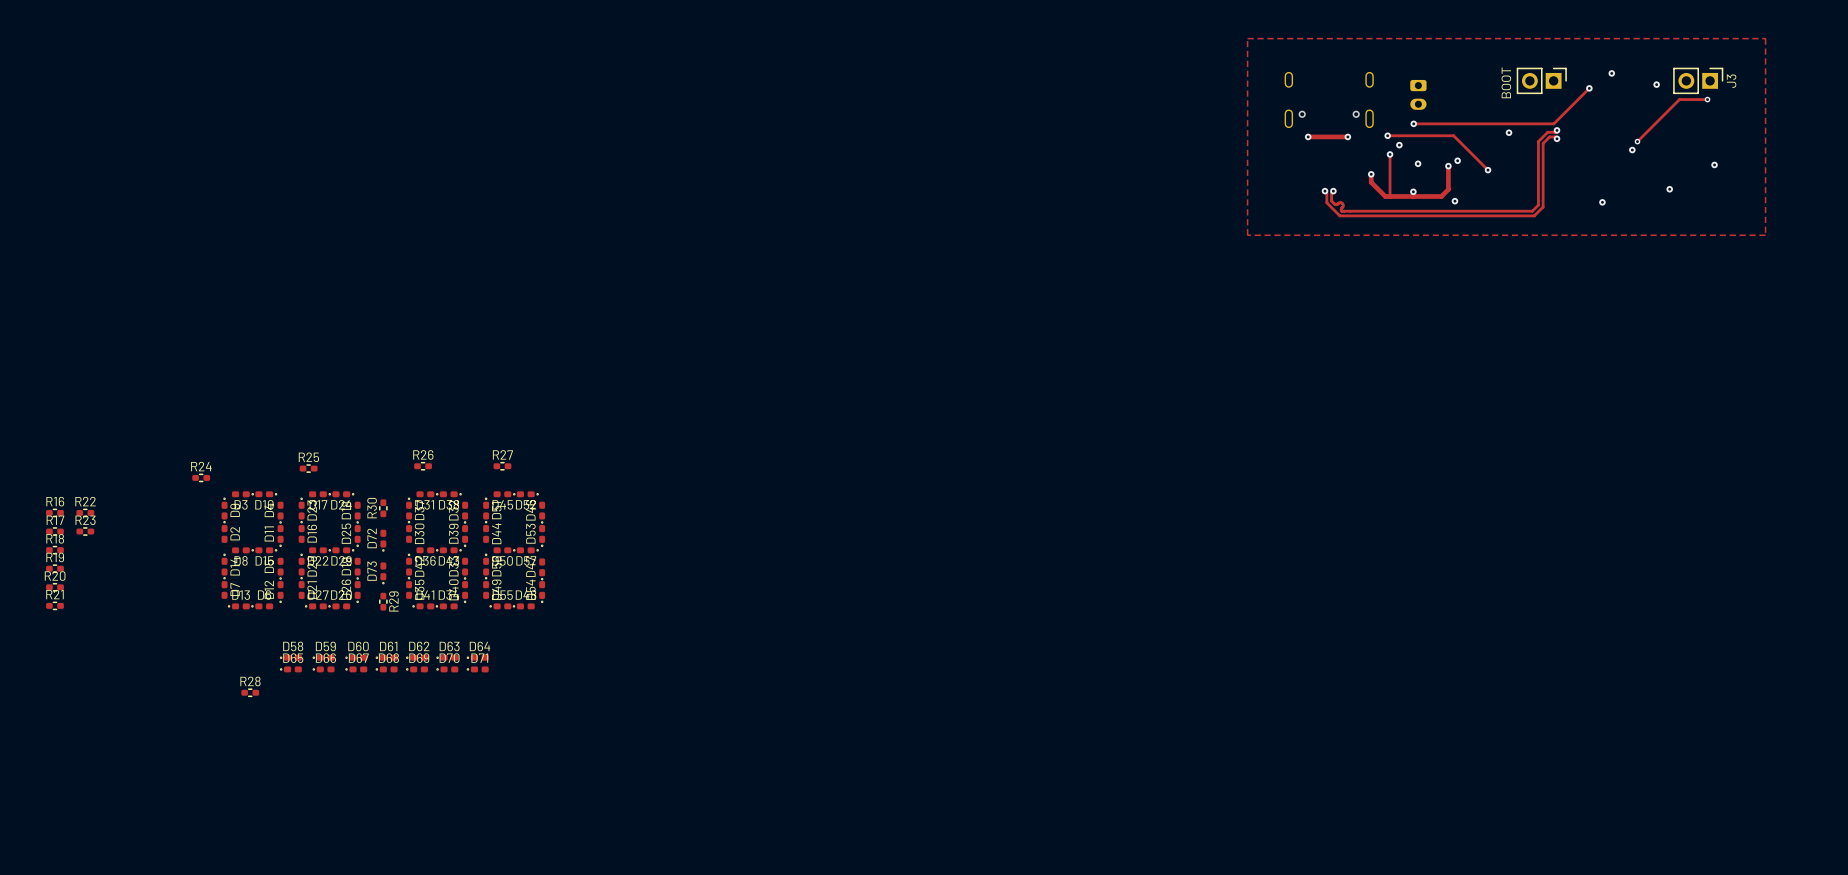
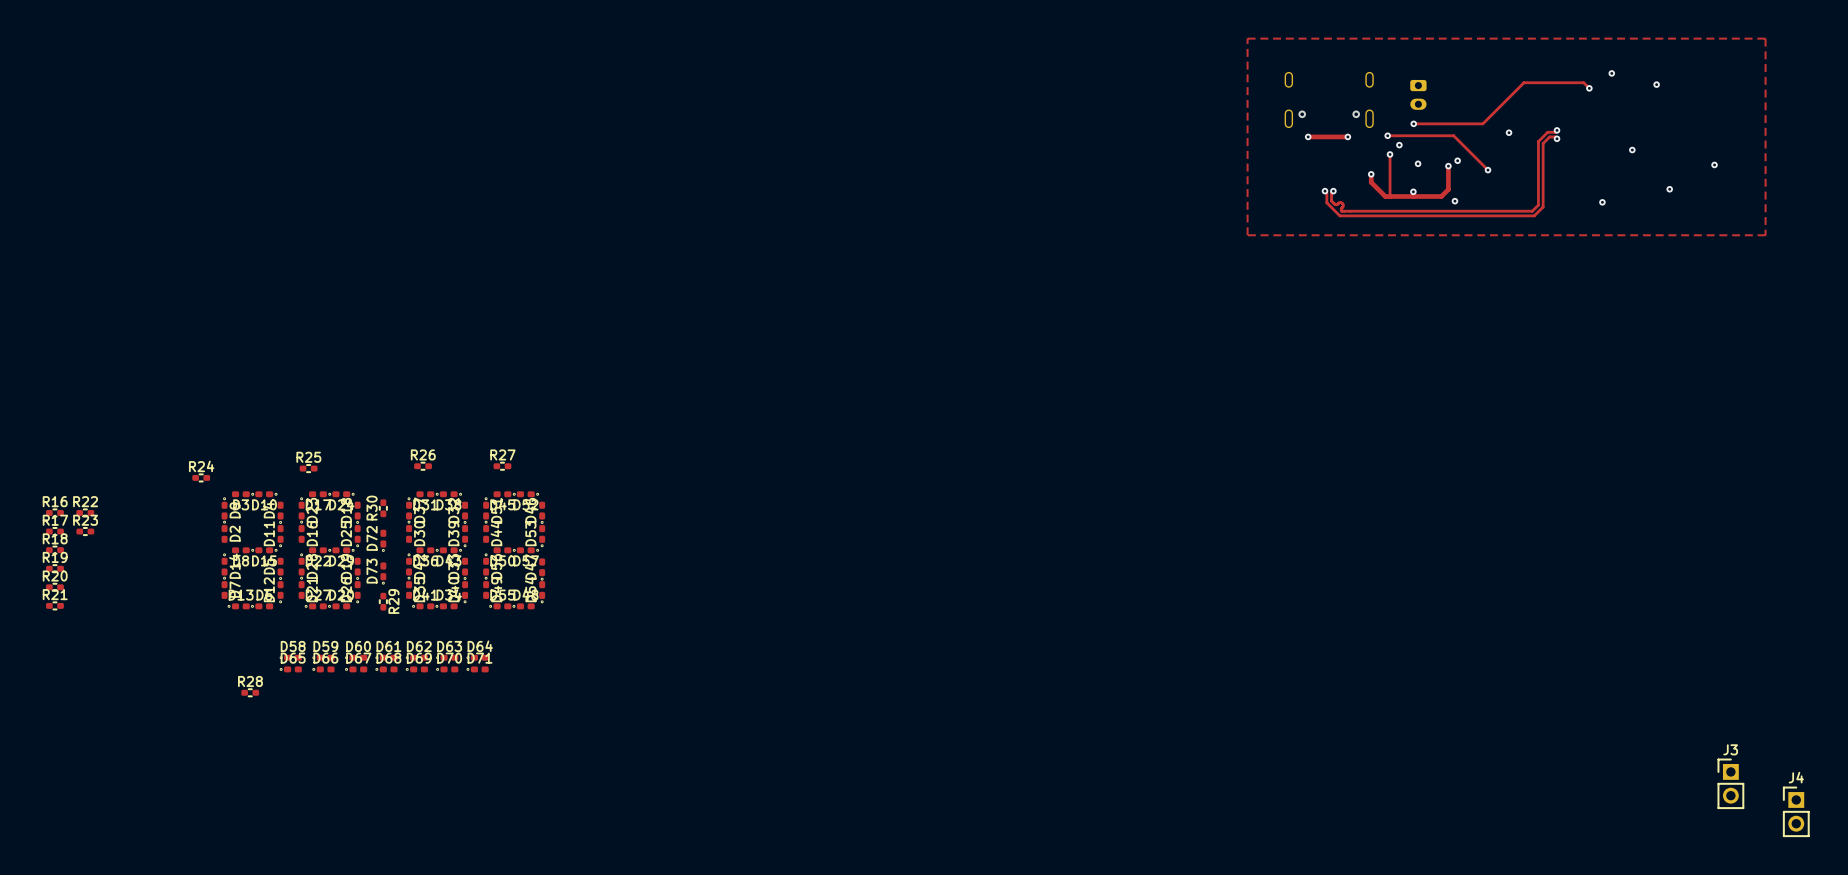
BOOT: (1541, 80) -> none
J3 rotation: 0° (1698, 80) -> 90° counterclockwise (1730, 783)
J3 position: (1698, 80) -> (1730, 783)
track: (1589, 88) (1553, 123) (1482, 123) -> (1589, 88) (1583, 82) (1523, 82) (1482, 123)
track: (1707, 99) (1679, 99) (1637, 141) -> none
via: (1707, 99) -> none
via: (1637, 141) -> none
J4: none -> (1796, 811)

